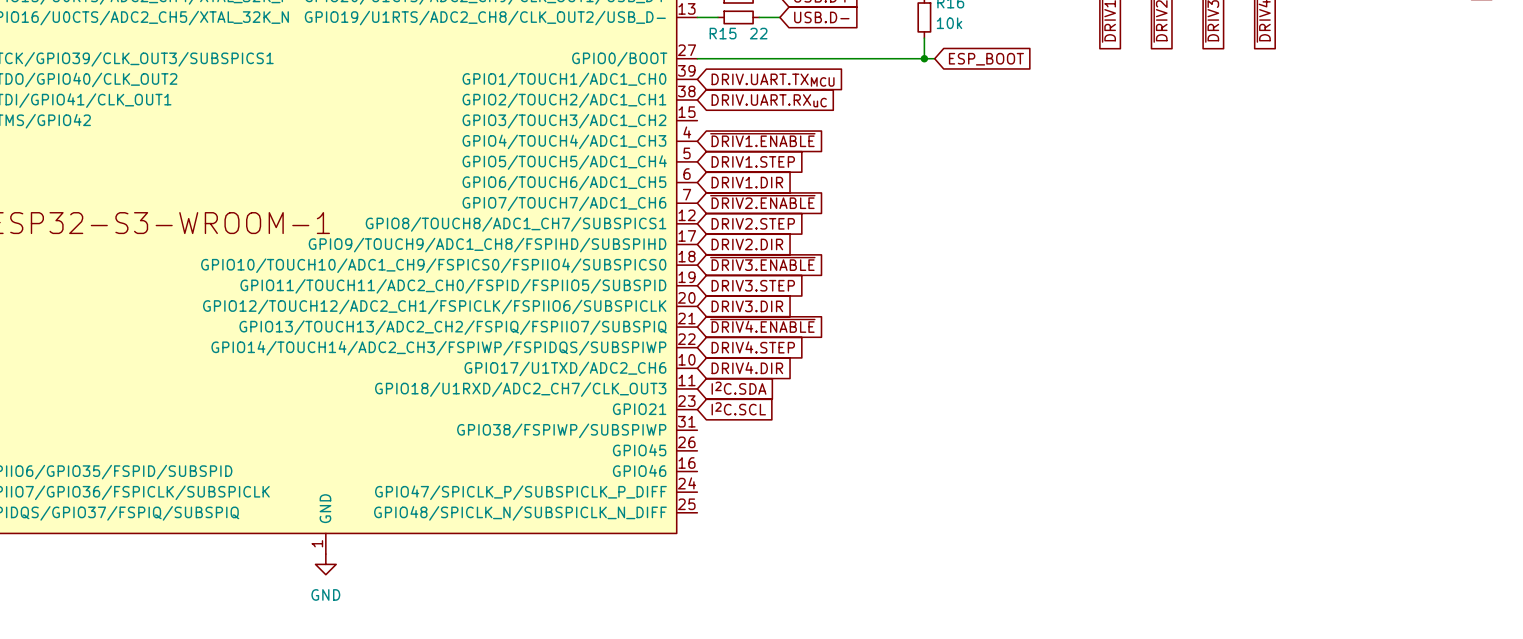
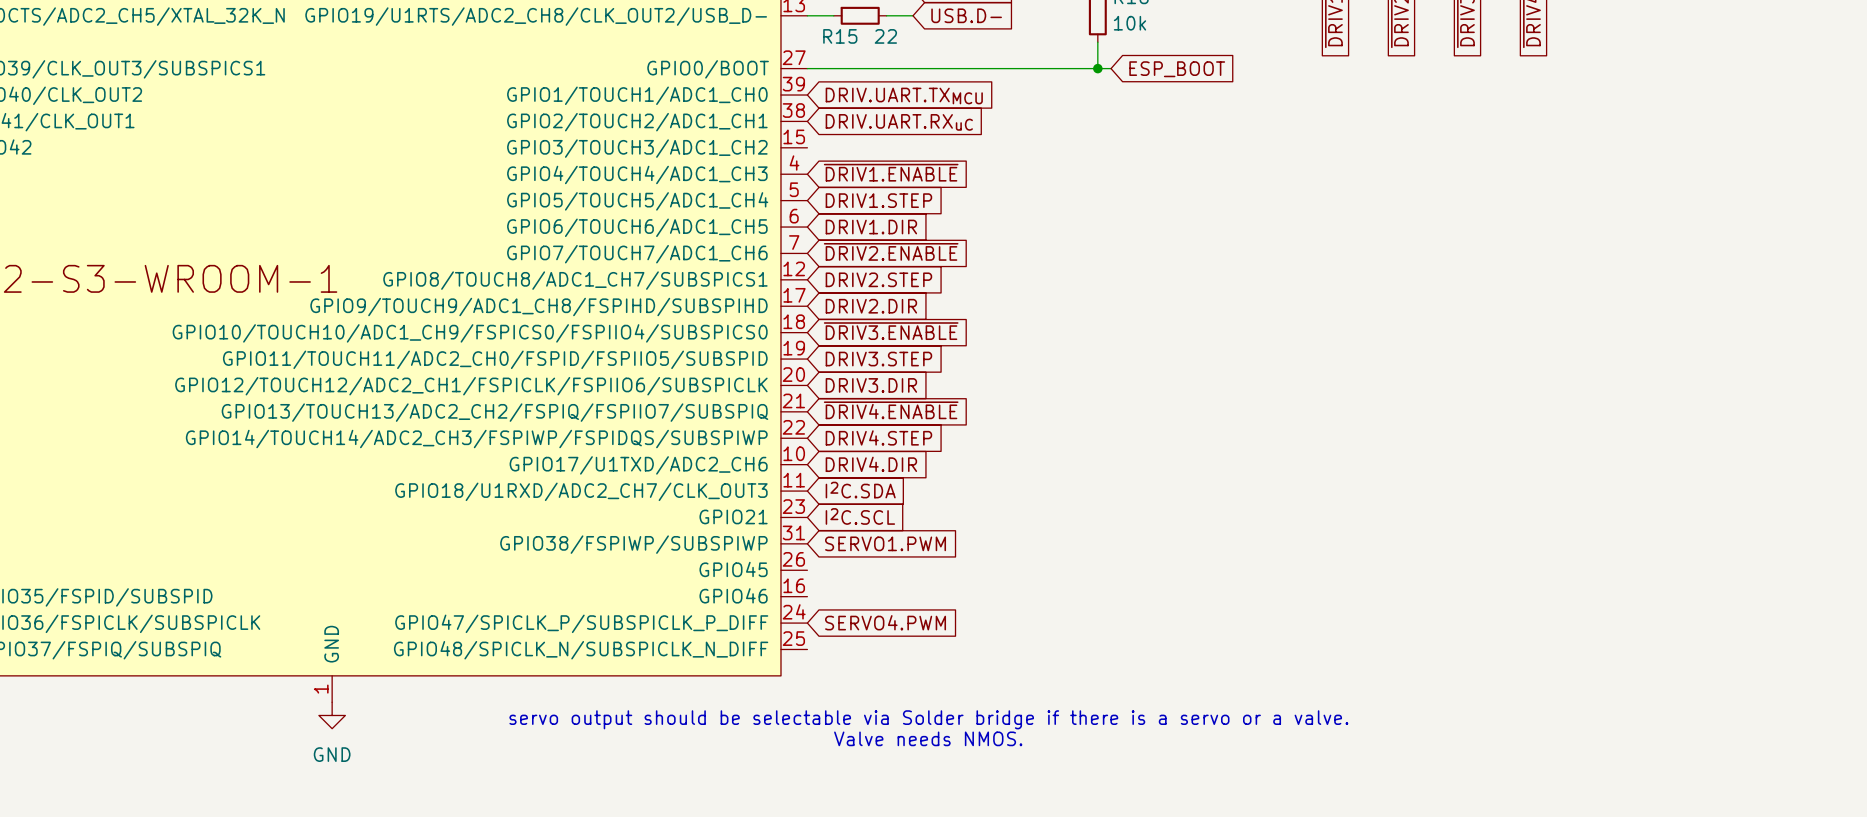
global label: none -> SERVO1.PWM (885, 543)
global label: none -> SERVO4.PWM (885, 622)
text: none -> servo output should be selectable via Solder bridge if there is a servo or a valve. (928, 719)
text: none -> Valve needs NMOS. (928, 738)

